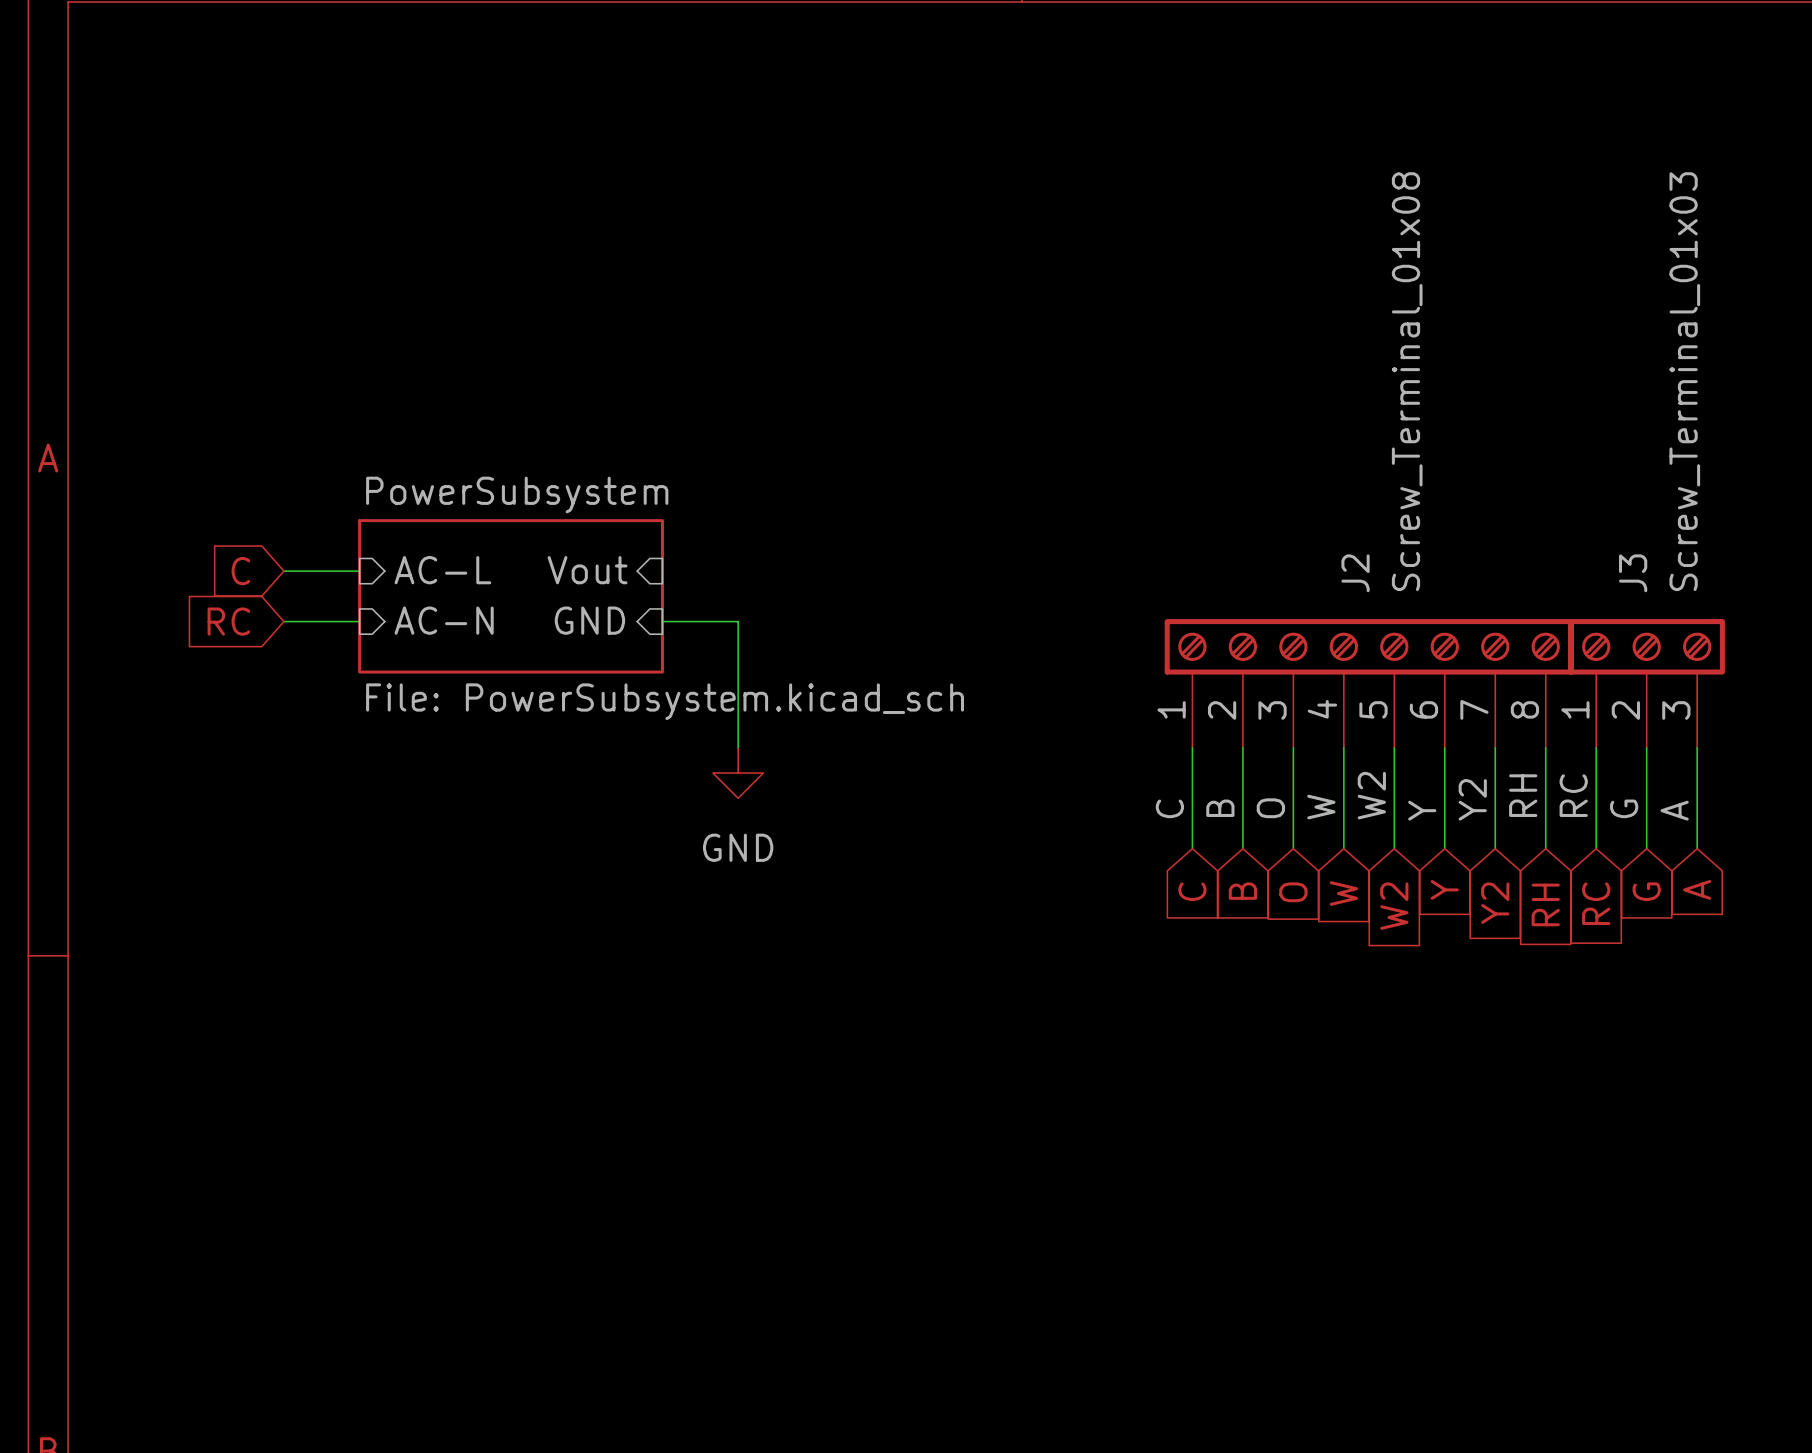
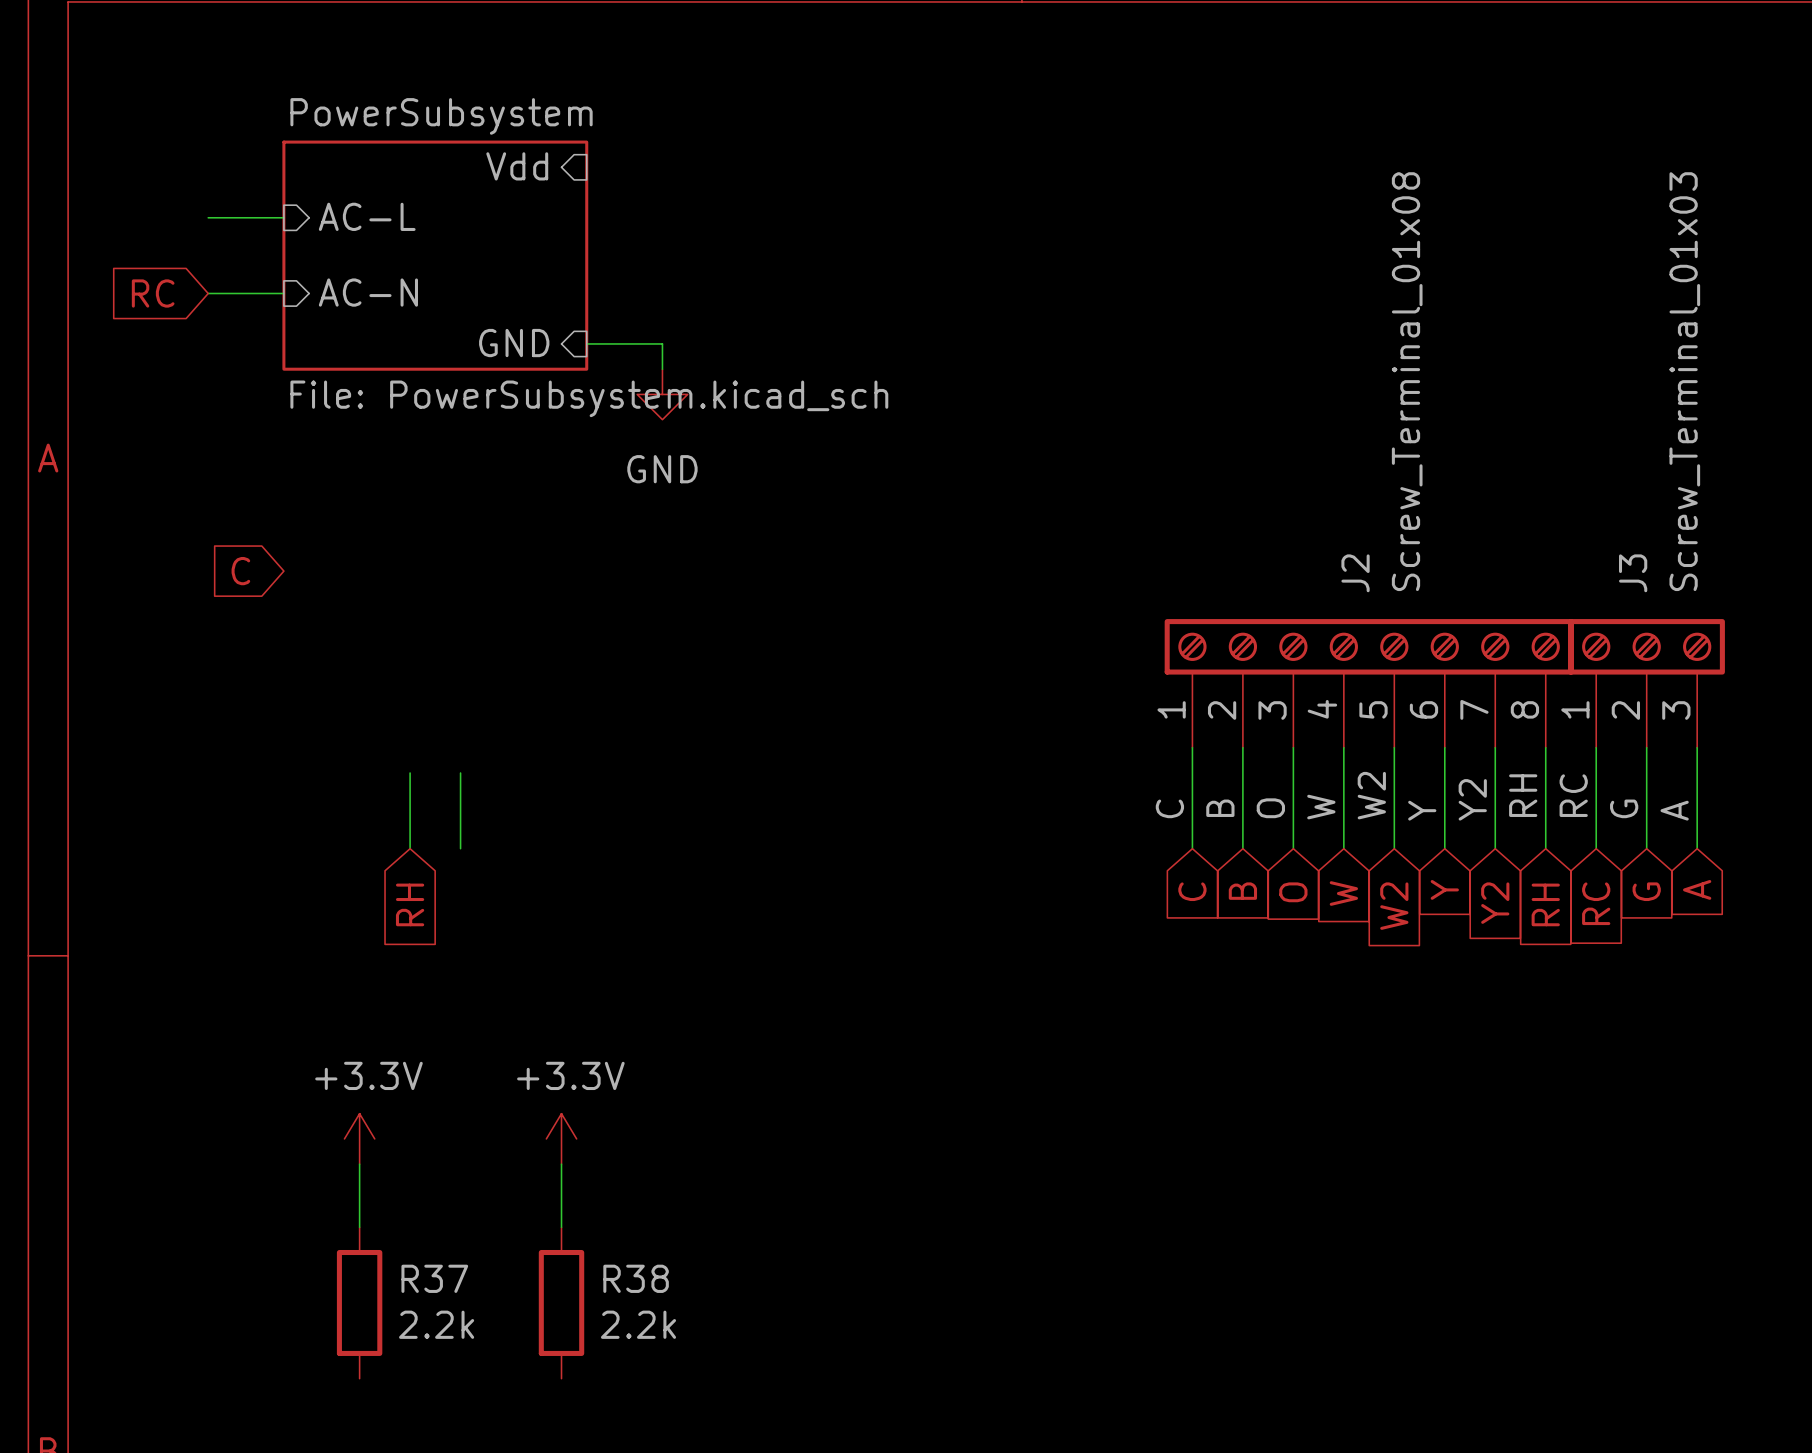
sheet pin: none -> Vdd (517, 166)
sheet PowerSubsystem: none -> File: PowerSubsystem.kicad_sch (435, 255)
wire: none -> (586, 343) (662, 343) (662, 369)
sheet pin position: AC-L (442, 570) -> AC-L (367, 216)
sheet pin: Vout (587, 570) -> none
wire: (283, 571) (359, 571) -> (208, 293) (283, 293)
sheet PowerSubsystem: File: PowerSubsystem.kicad_sch (511, 596) -> none
sheet pin position: AC-N (444, 620) -> AC-N (368, 292)
sheet pin position: GND (589, 620) -> GND (514, 343)
global label position: RC (228, 621) -> RC (153, 293)
wire: (283, 621) (359, 621) -> (208, 217) (283, 217)
wire: (662, 621) (738, 621) (738, 747) -> none
wire: none -> (410, 773) (410, 848)
wire: none -> (460, 773) (460, 848)
power symbol position: GND (738, 773) -> GND (662, 394)
global label: none -> RH (410, 904)
power symbol: none -> +3.3V (359, 1138)
power symbol: none -> +3.3V (561, 1138)
wire: none -> (359, 1164) (359, 1227)
wire: none -> (561, 1164) (561, 1227)
R37: none -> 2.2k (359, 1302)
R38: none -> 2.2k (561, 1302)

